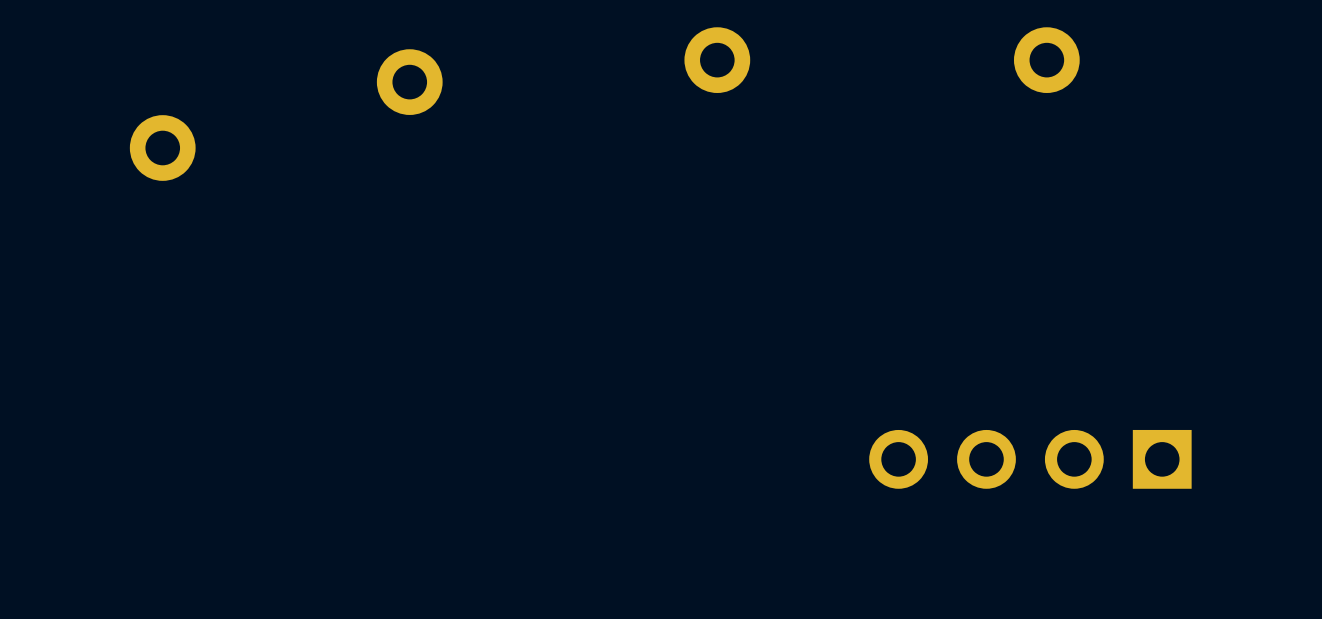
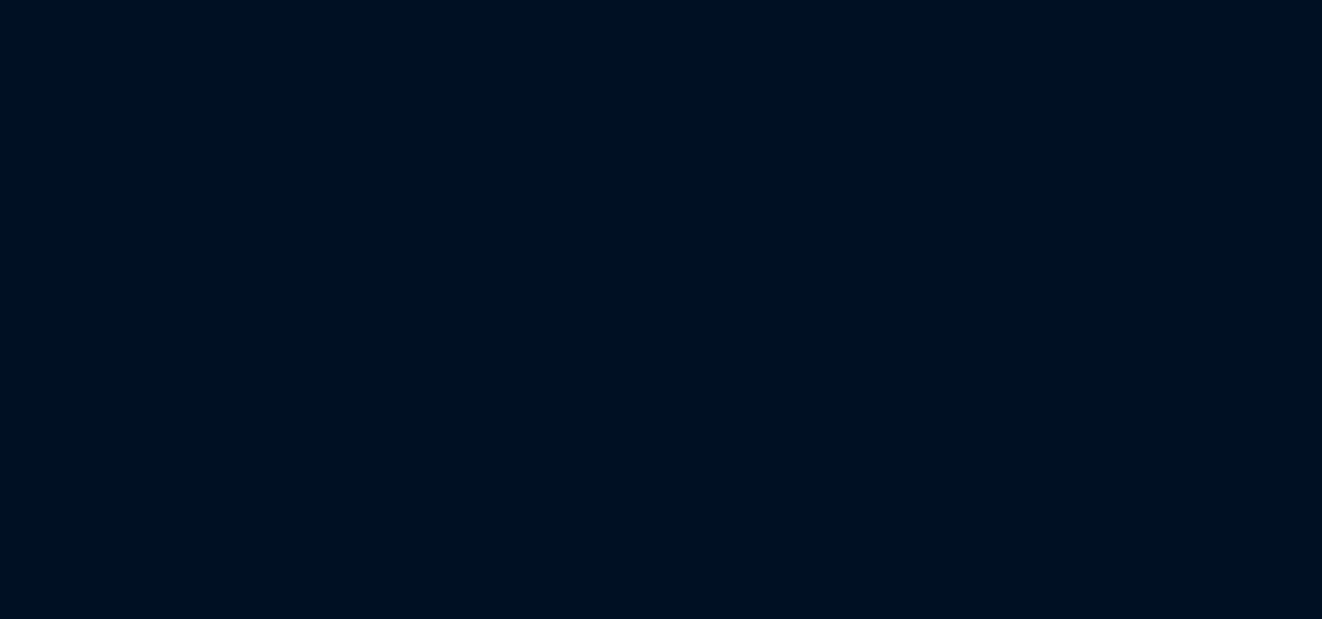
part: (717, 60) -> none
part: (1046, 60) -> none
part: (409, 82) -> none
part: (162, 148) -> none
part: (1030, 459) -> none

